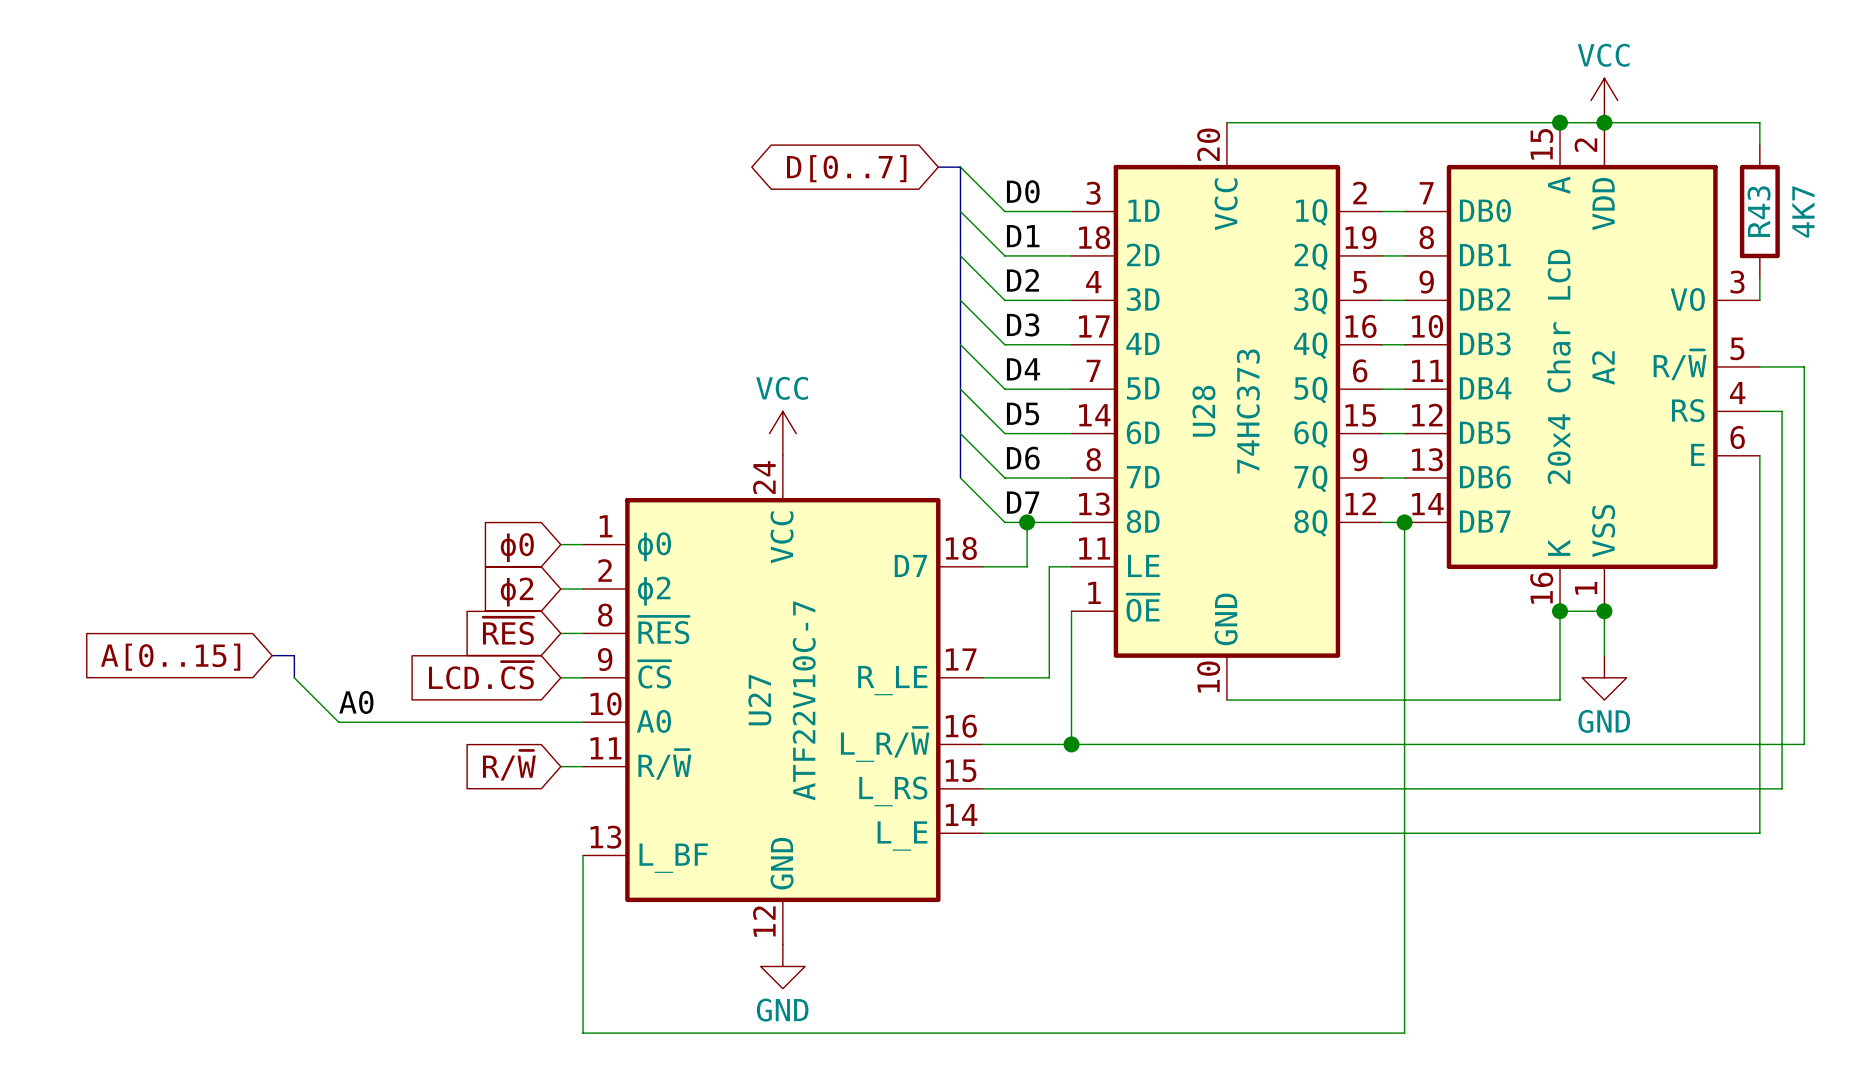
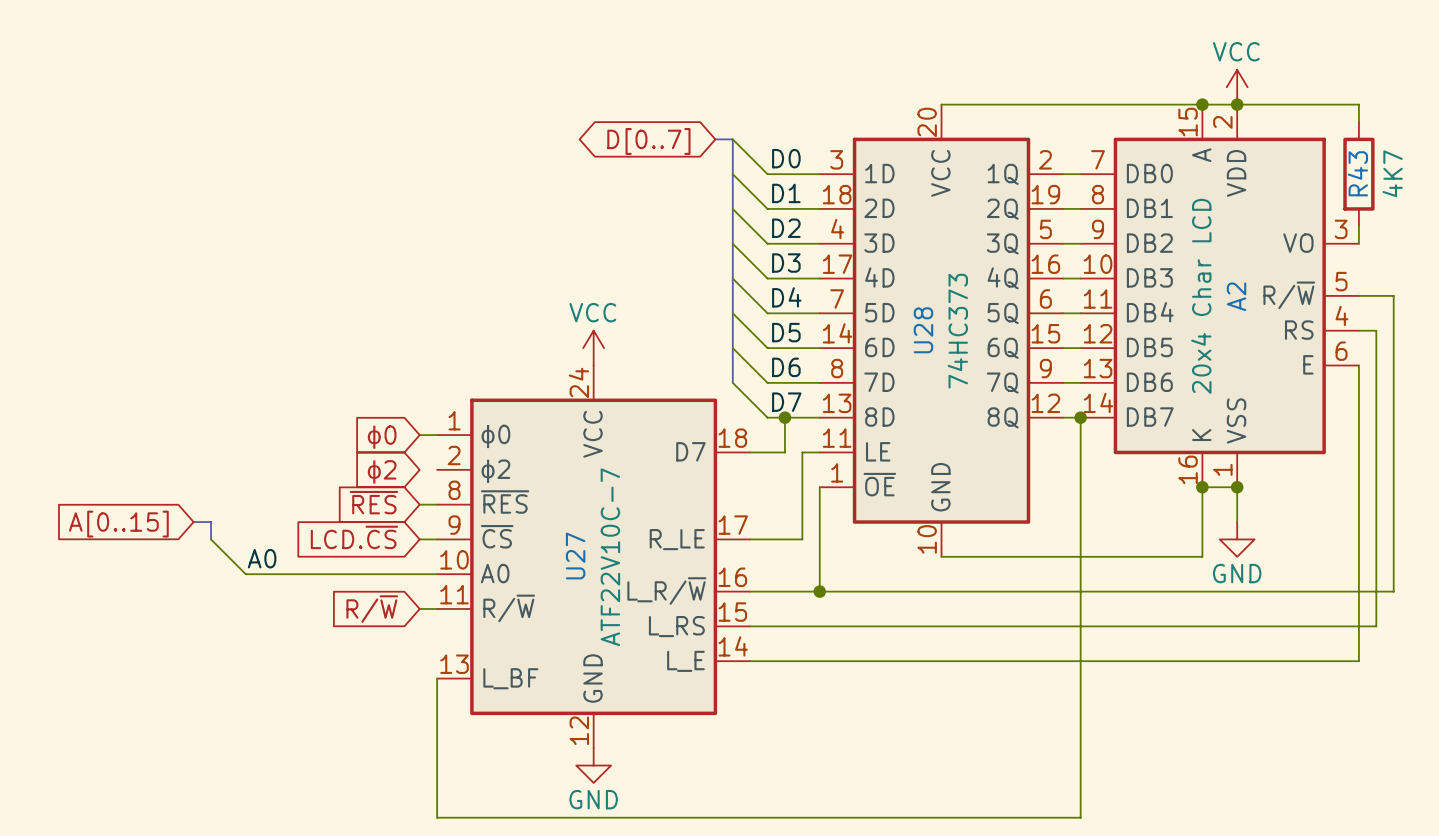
wire: (560, 589) (583, 589) -> none

